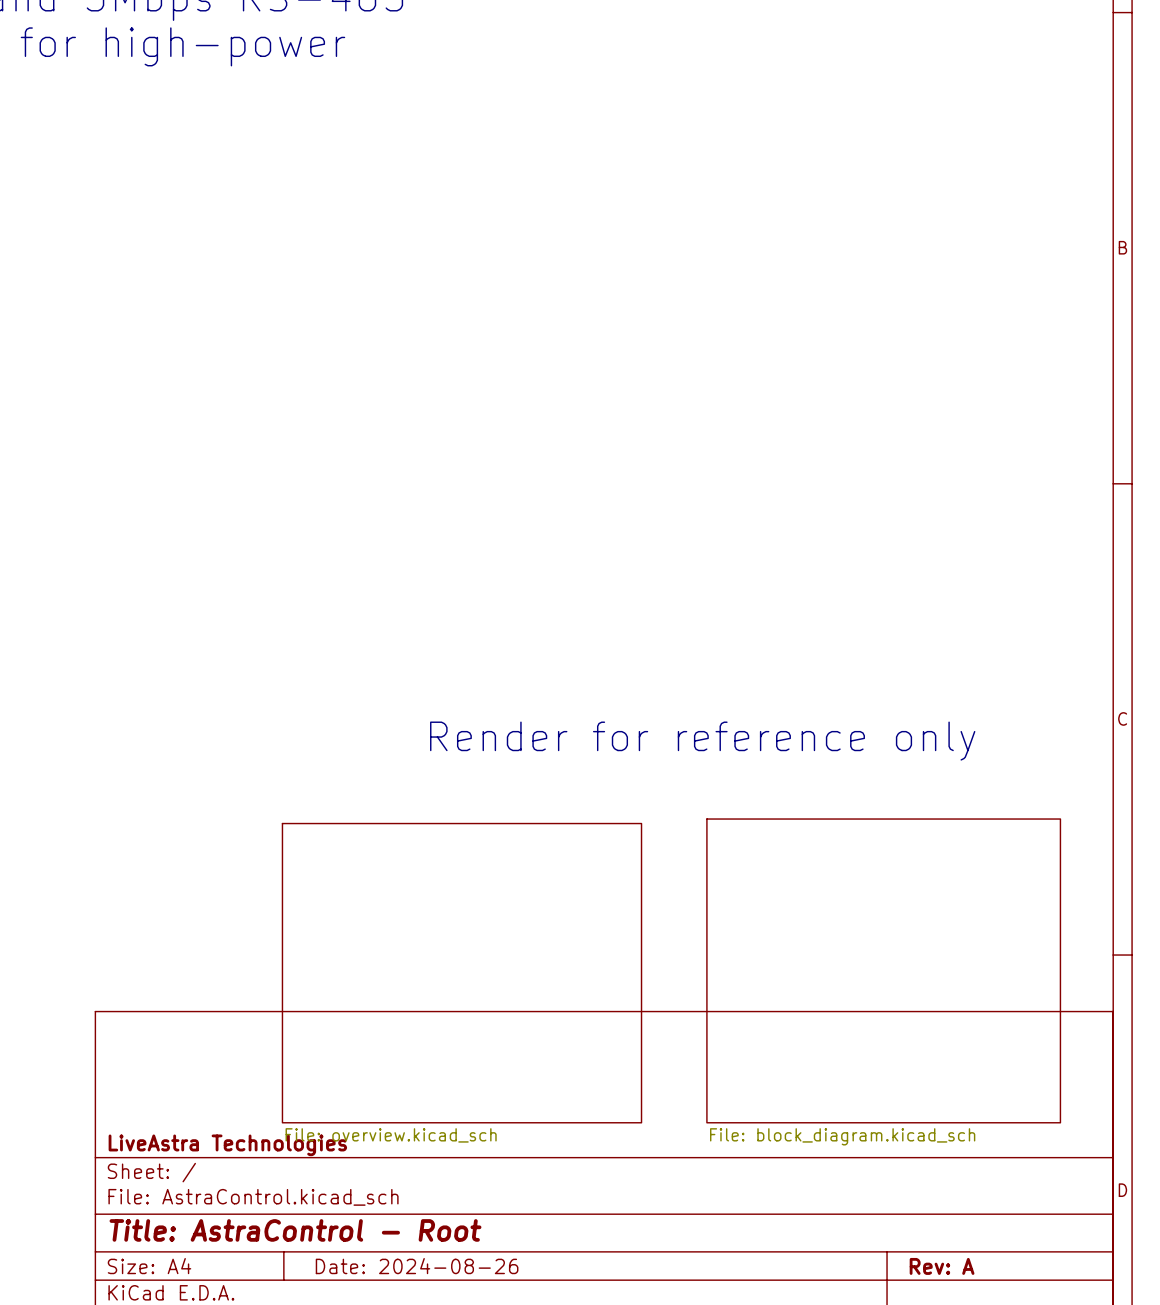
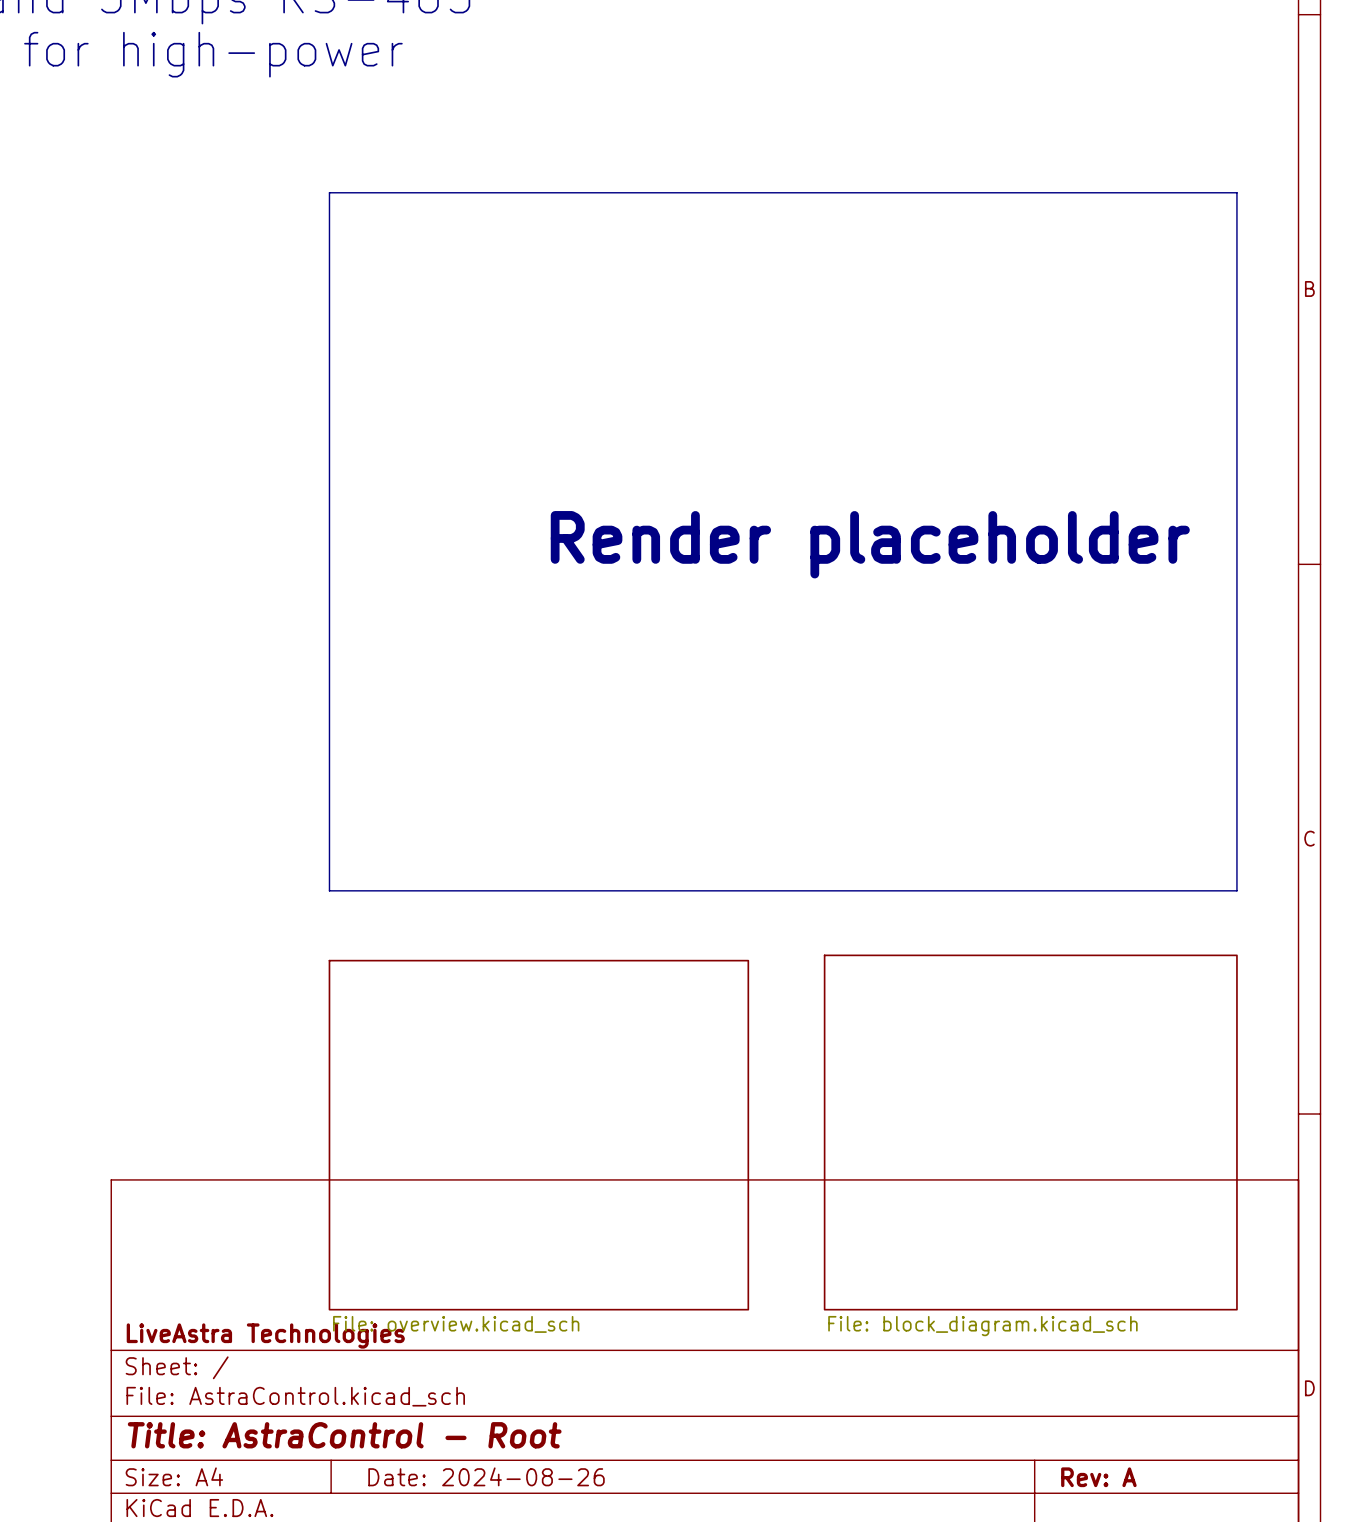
line: none -> (329, 192) (1236, 192) (1236, 890) (329, 890) (329, 192)
text: none -> Render placeholder (870, 544)
text: Render for reference only (702, 741) -> none

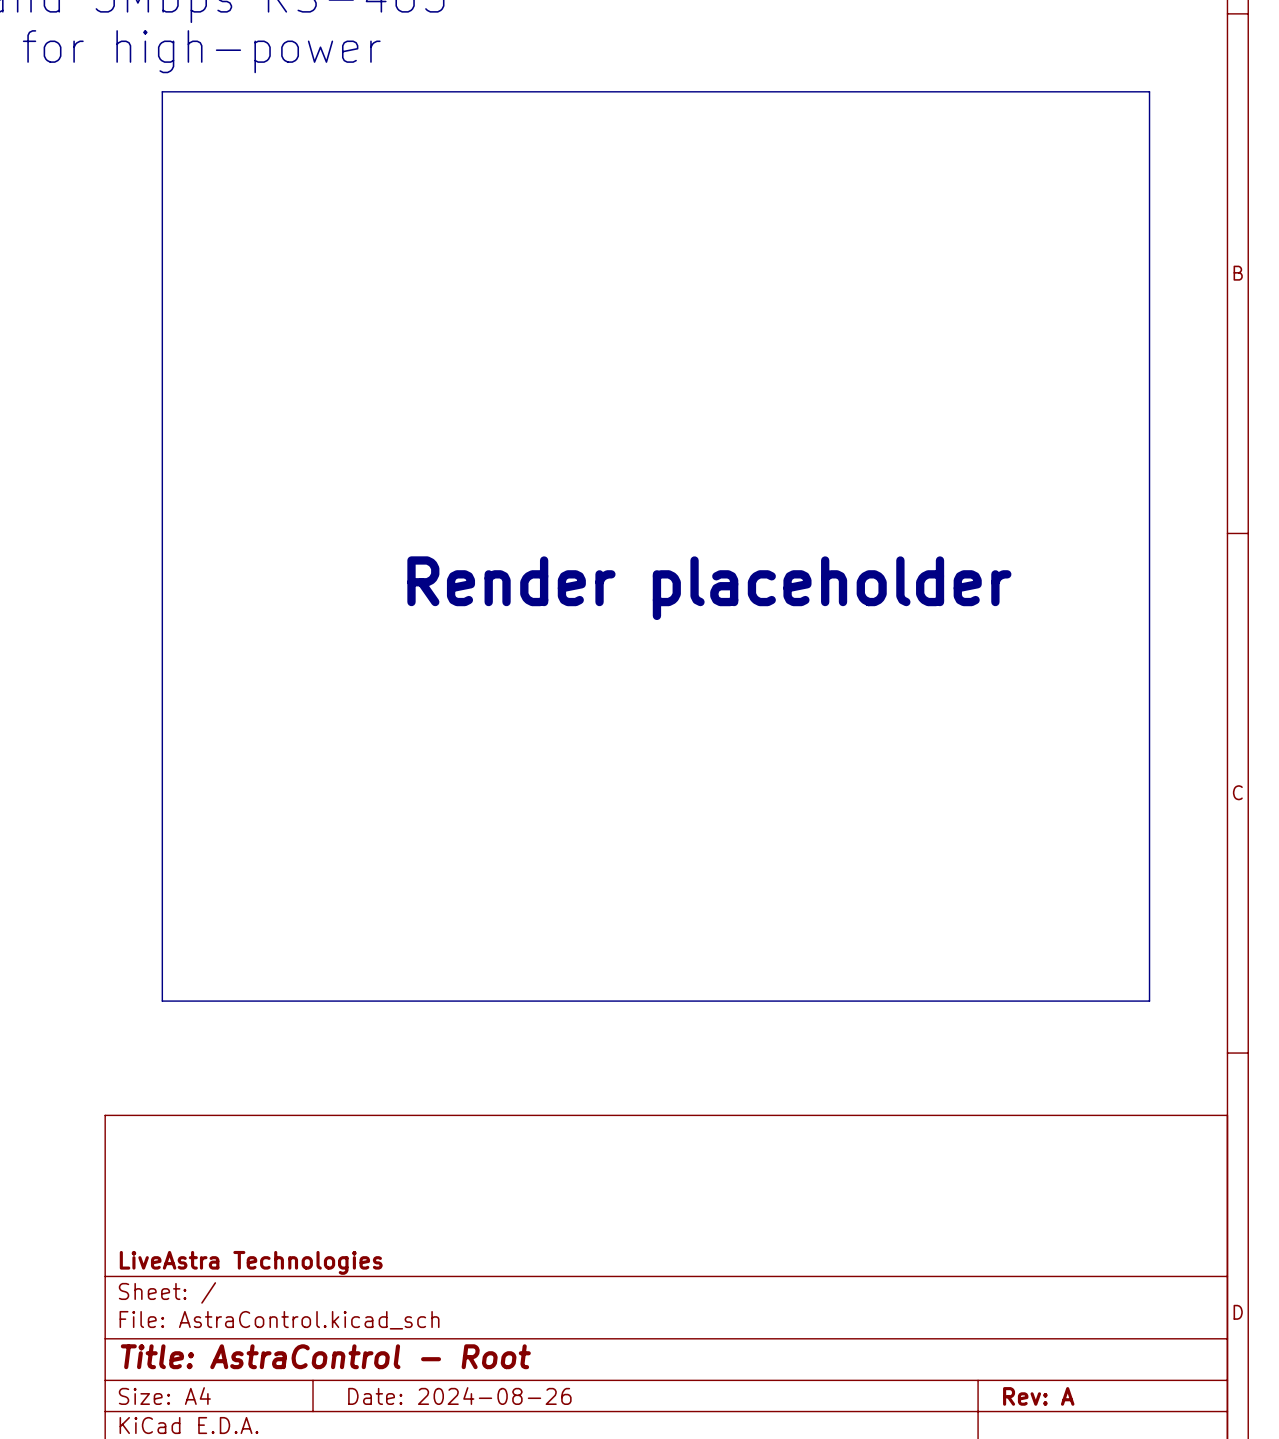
line: (329, 192) (1236, 192) (1236, 890) (329, 890) (329, 192) -> (162, 91) (162, 1001) (1149, 1001) (1149, 91) (162, 91)
text position: Render placeholder (870, 544) -> Render placeholder (709, 588)
sheet: File: block_diagram.kicad_sch (1030, 1132) -> none
sheet: File: overview.kicad_sch (538, 1135) -> none

